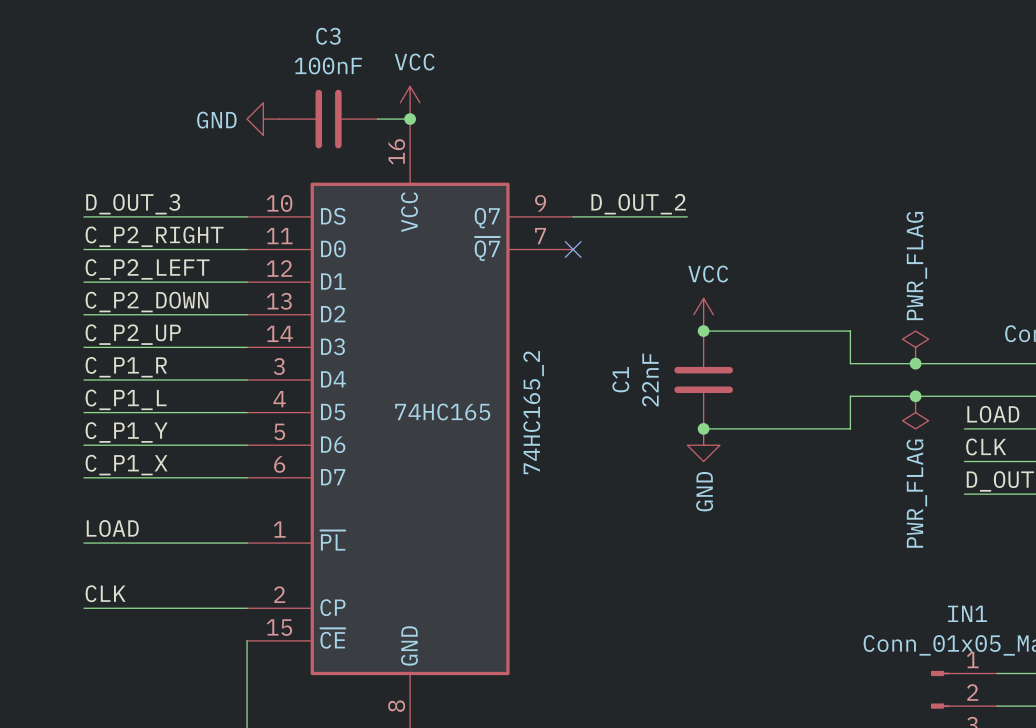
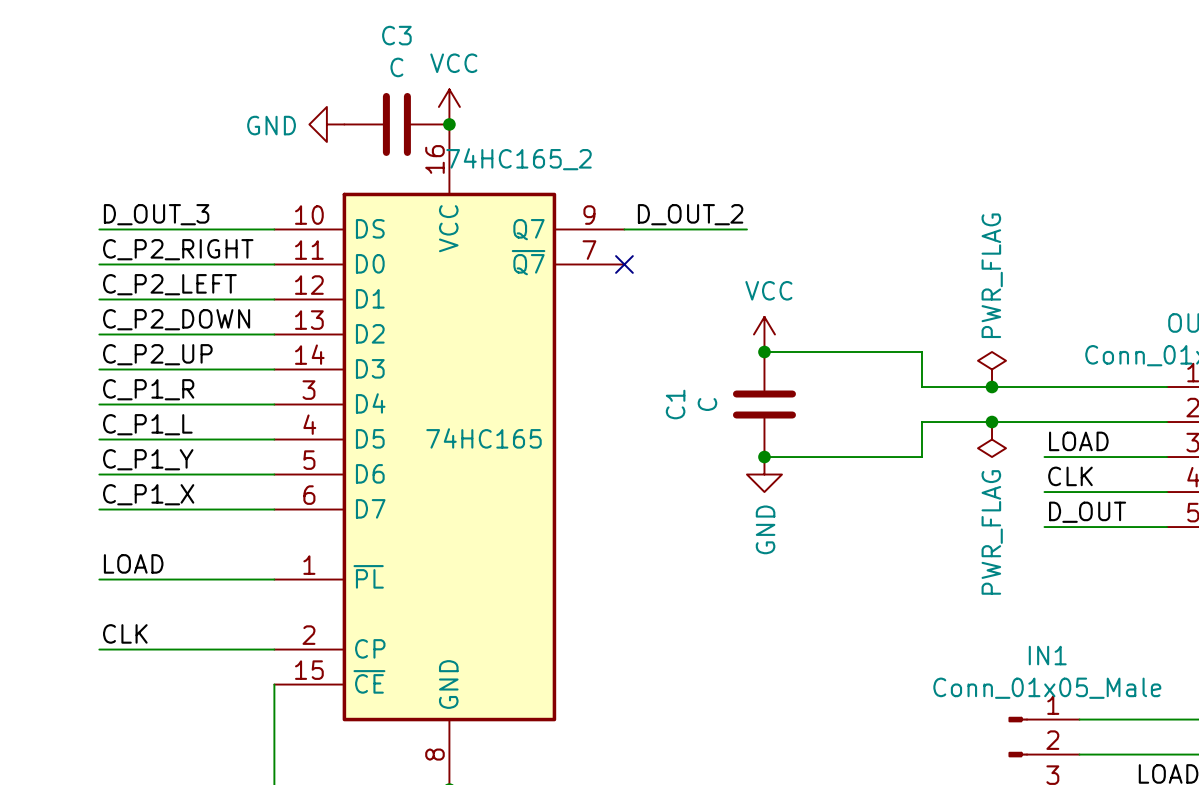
C3 value: 100nF (328, 65) -> C (396, 67)
power symbol position: GND (263, 119) -> GND (326, 124)
C3 position: (328, 119) -> (396, 124)
C1 value: 22nF (650, 380) -> C (707, 404)
74HC165_2 name rotation: 0° (533, 412) -> 90° clockwise (519, 159)
74HC165_2 name position: 74HC165_2 (533, 412) -> 74HC165_2 (519, 159)

